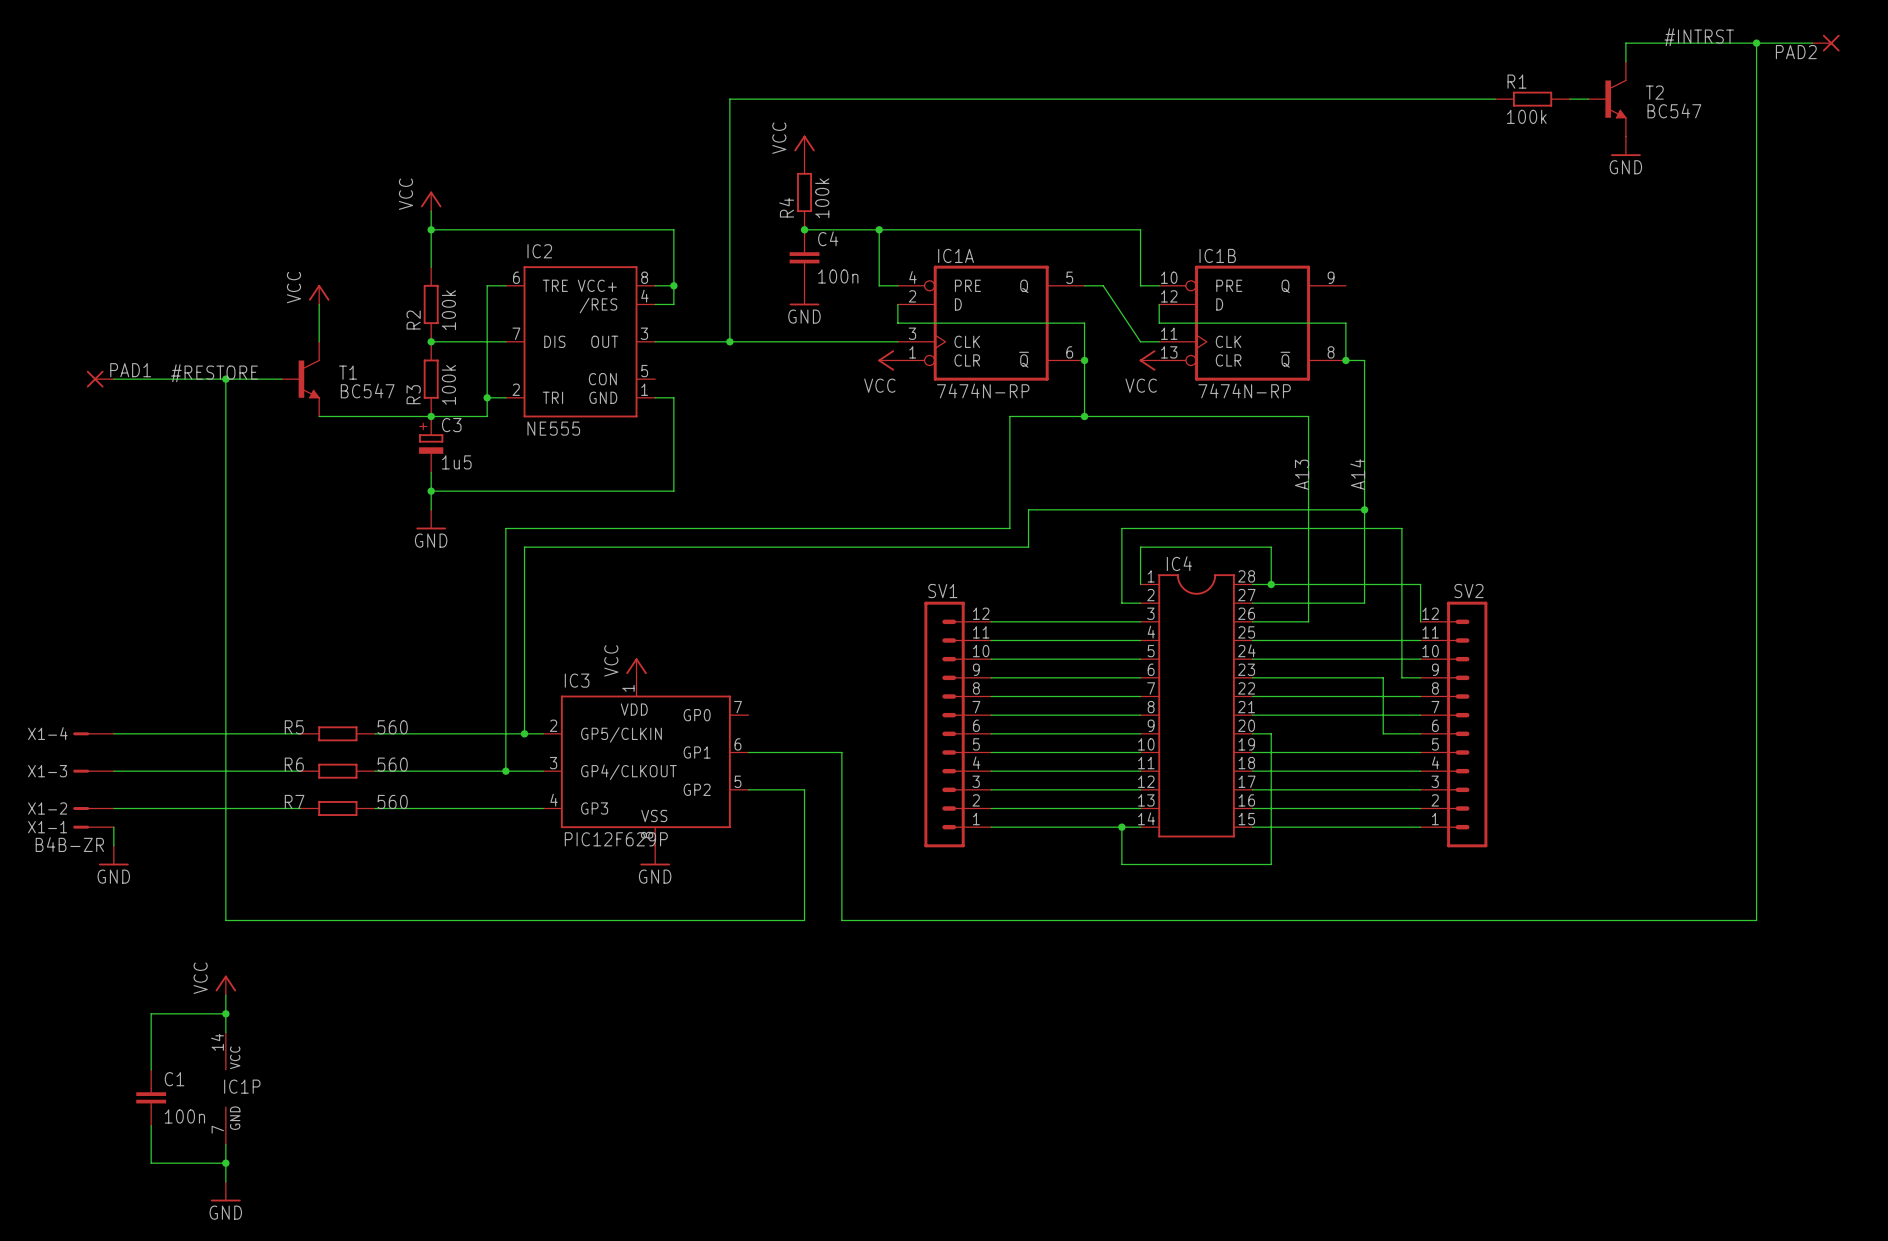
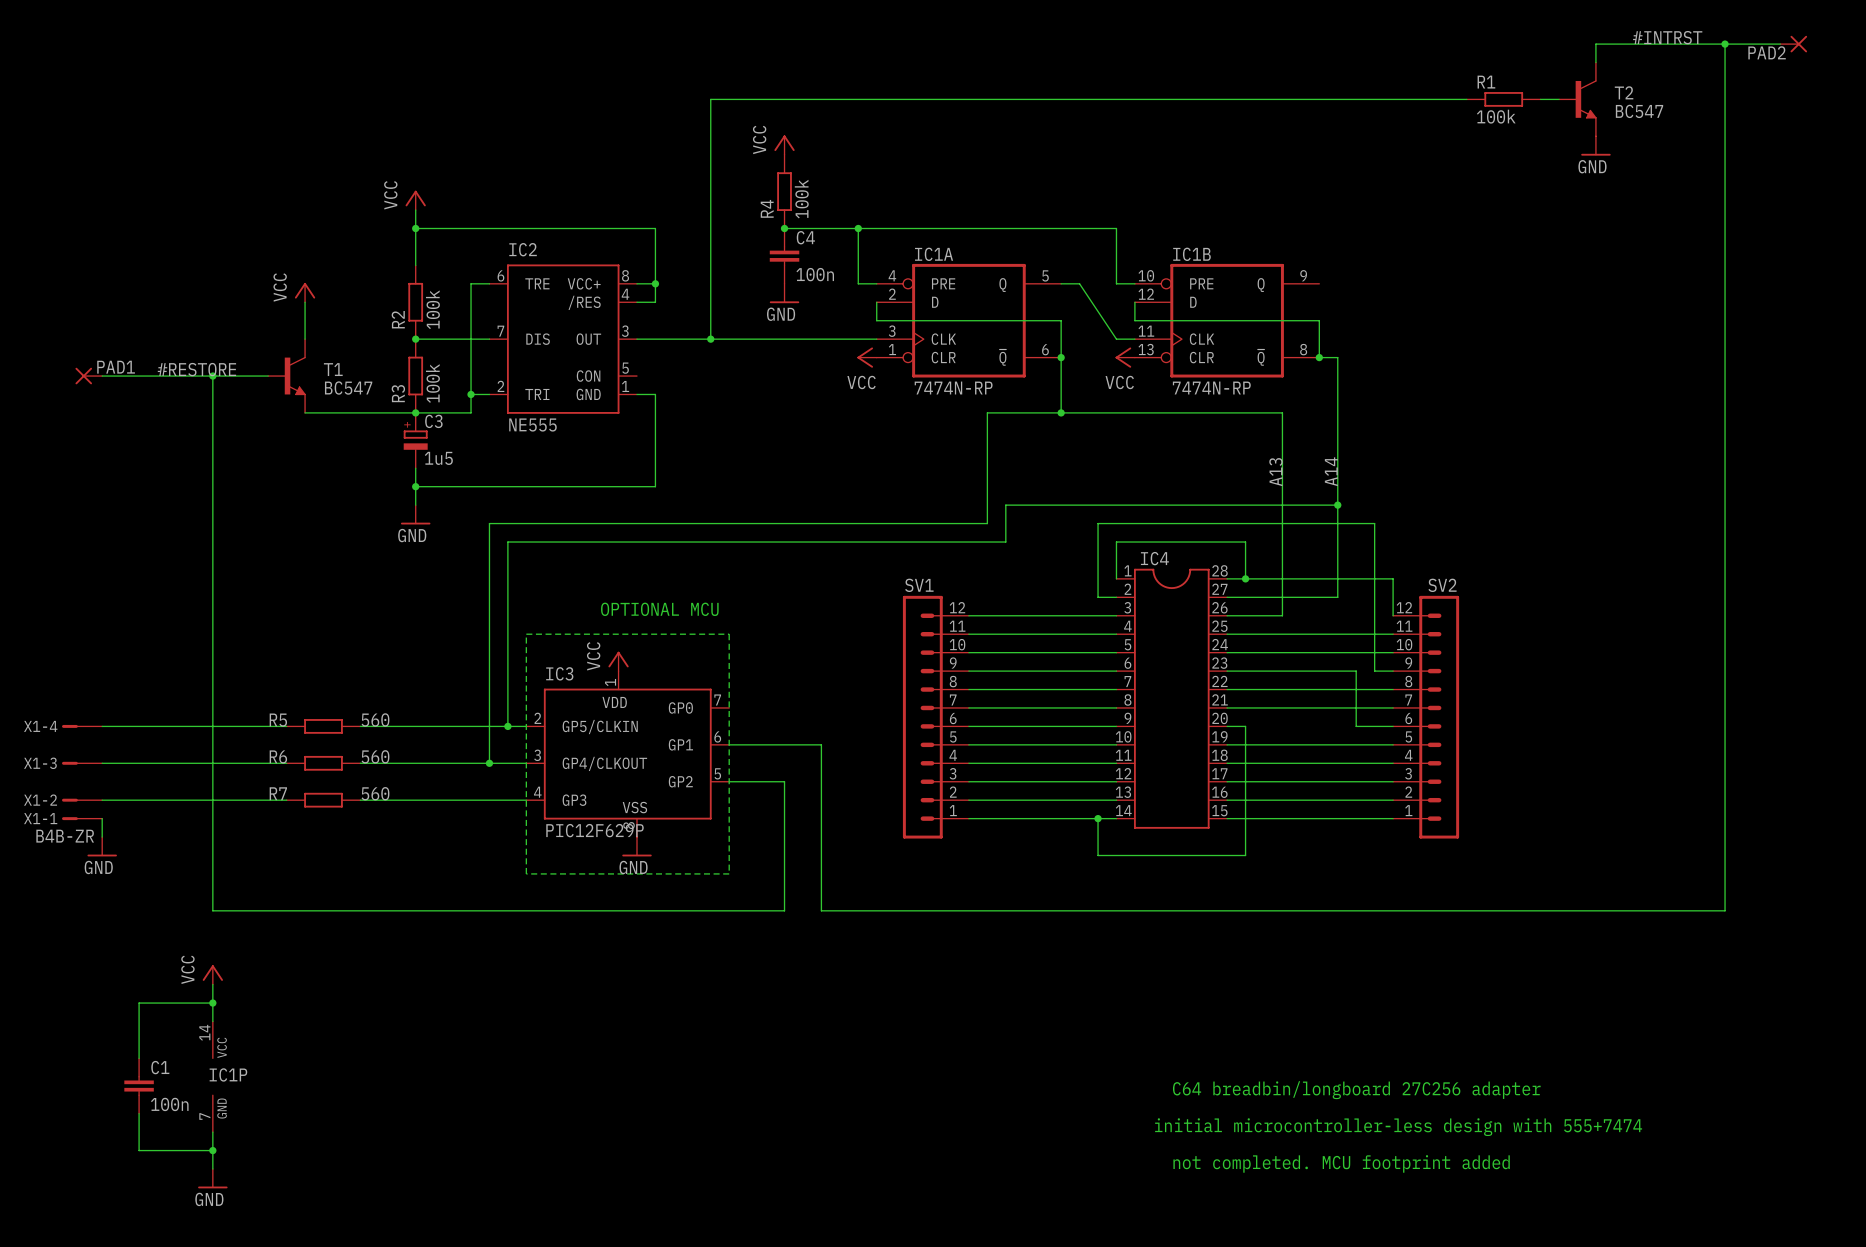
text: none -> OPTIONAL MCU (659, 609)
wire: none -> (526, 634) (729, 634) (729, 873) (526, 873) (526, 634)
text: none -> C64 breadbin/longboard 27C256 adapter (1356, 1090)
text: none -> initial microcontroller-less design with 555+7474 (1398, 1127)
text: none -> not completed. MCU footprint added (1341, 1163)

